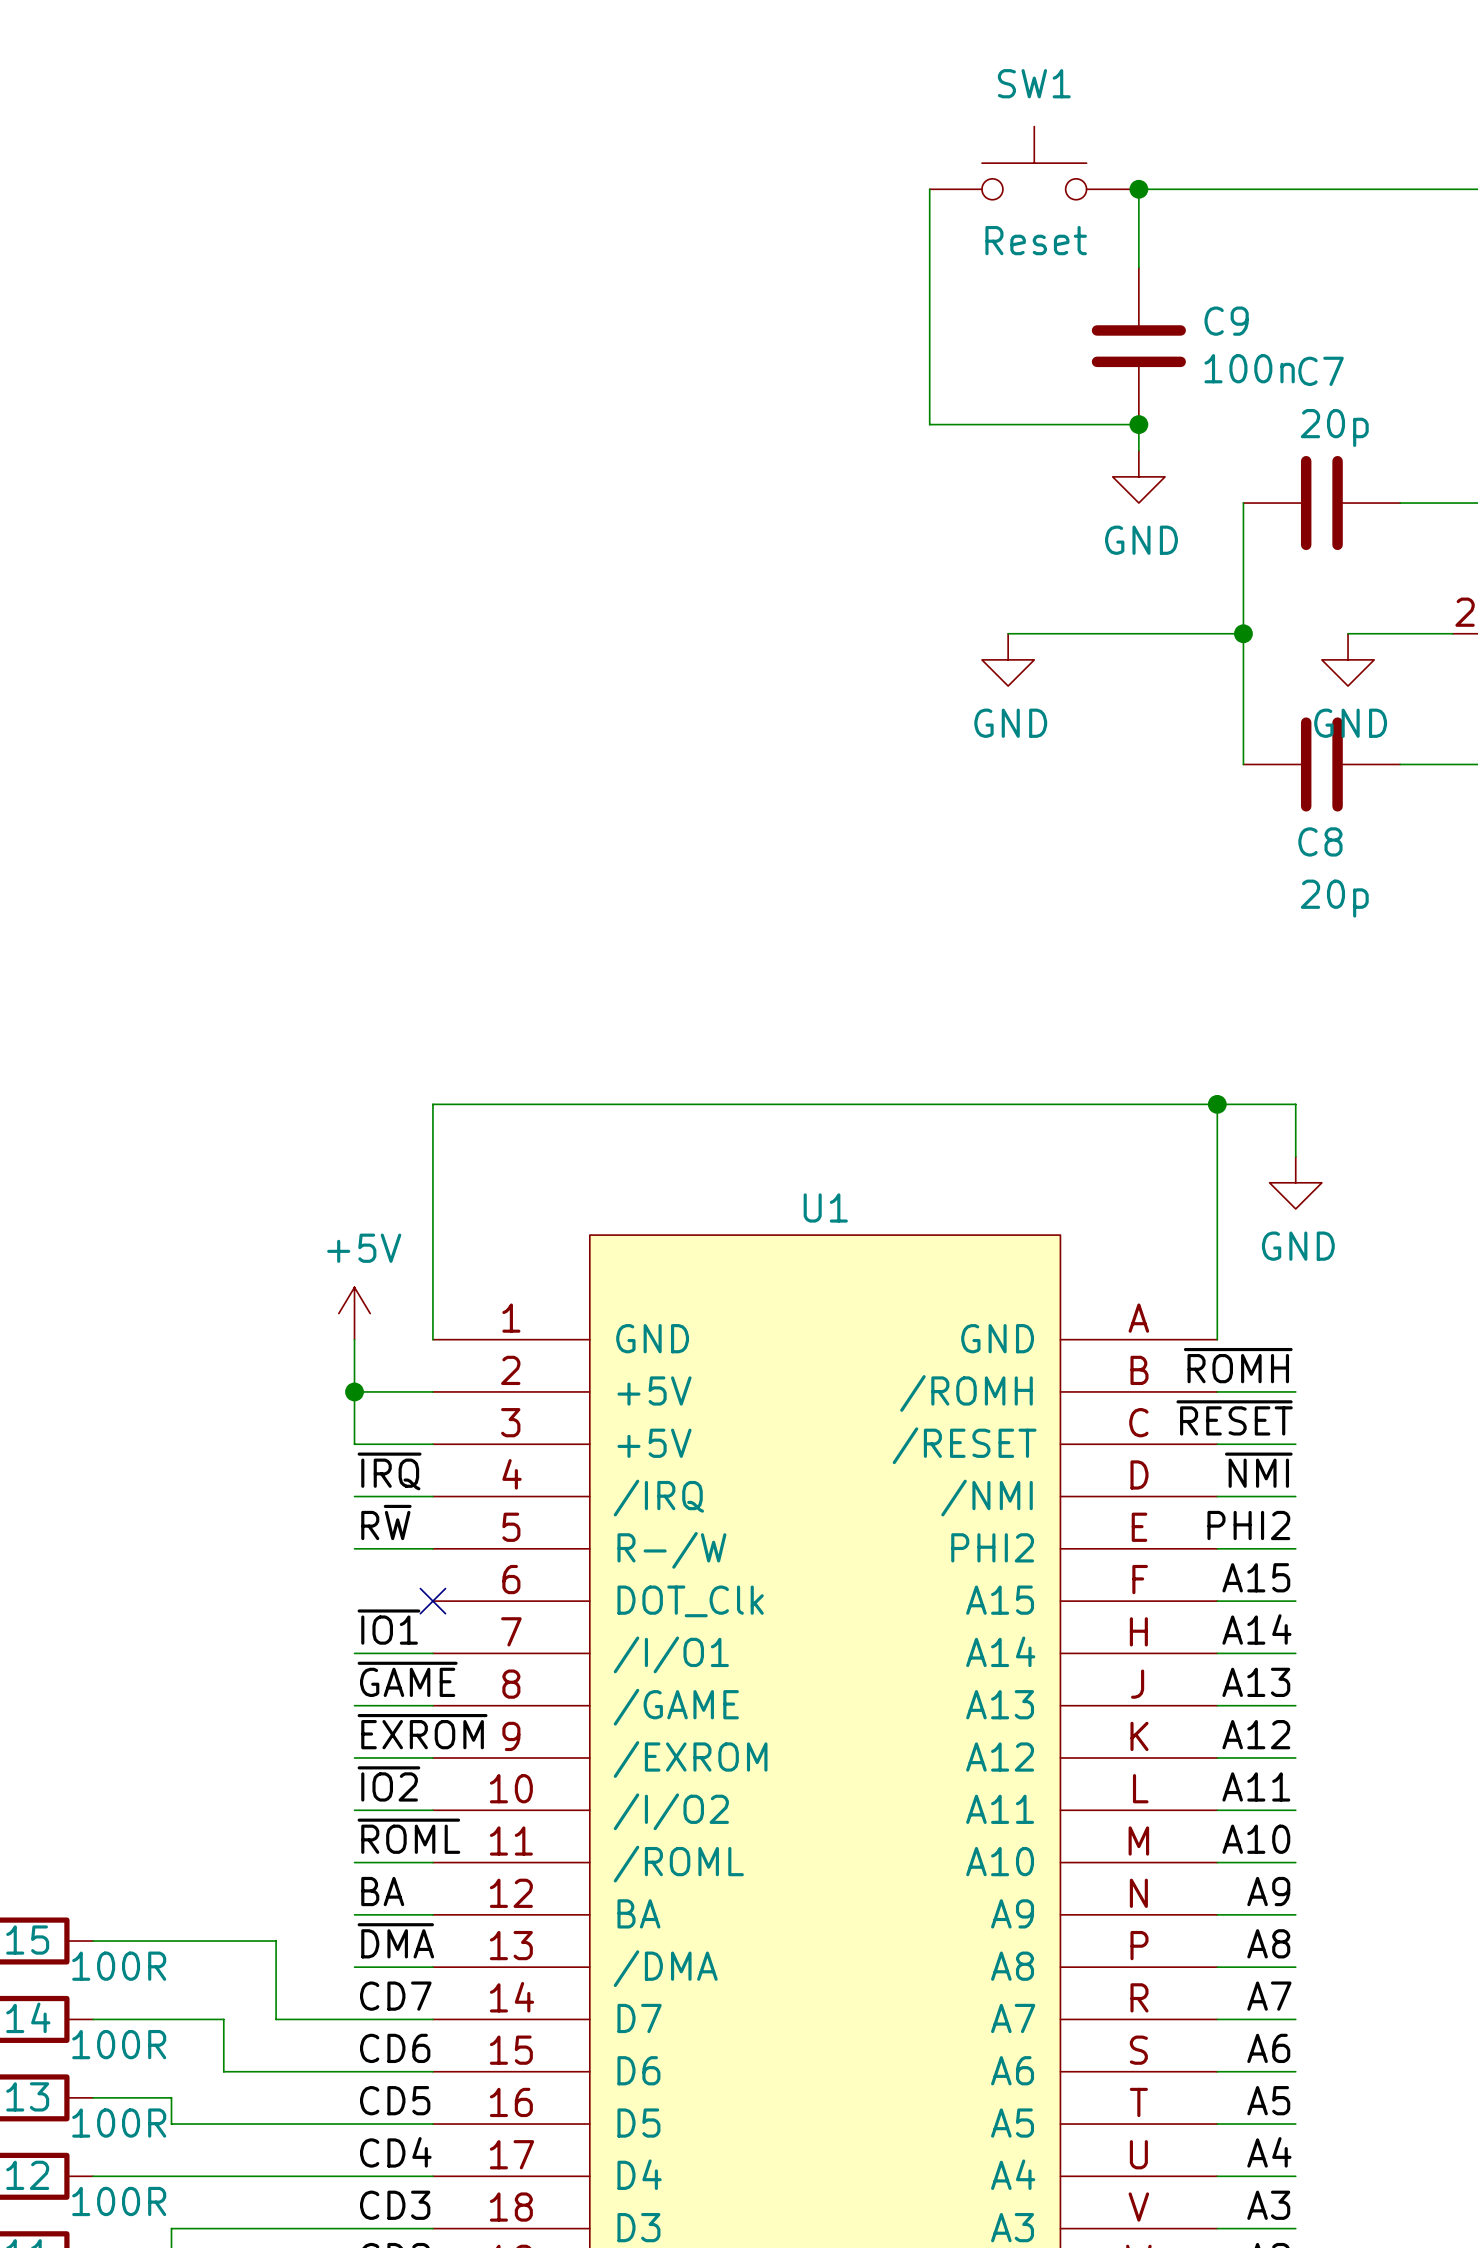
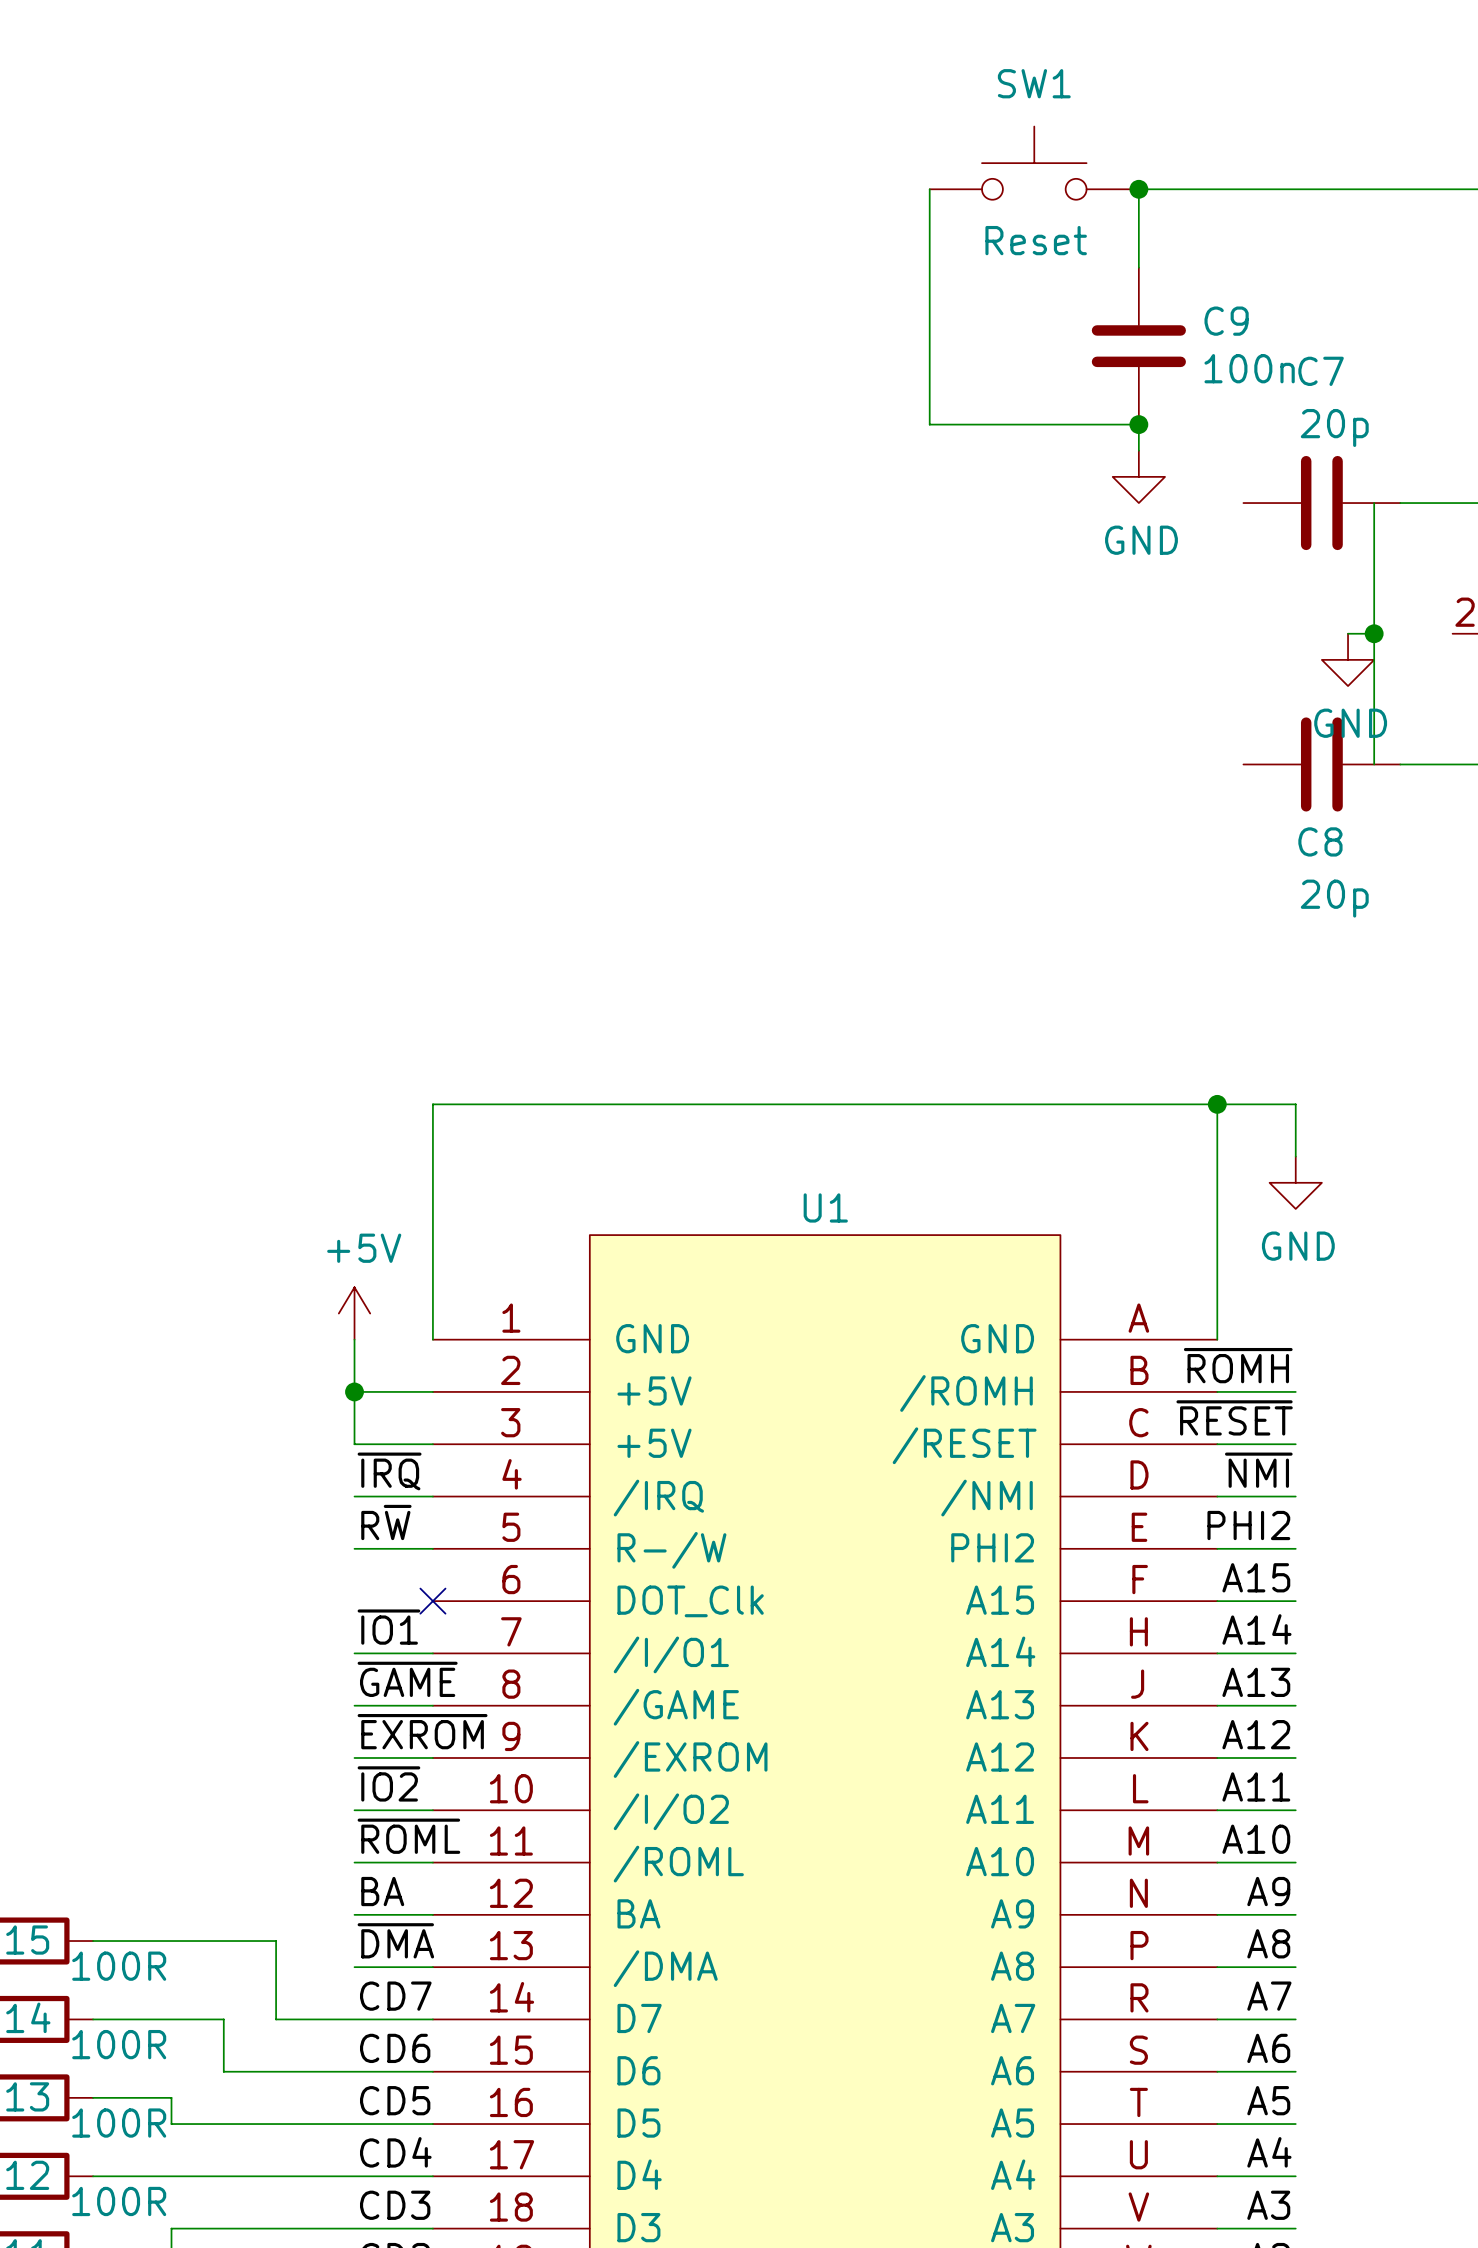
wire: (1243, 503) (1243, 764) -> (1374, 503) (1374, 764)
wire: (1008, 633) (1243, 633) -> none
junction: (1243, 633) -> none
wire: (1374, 633) (1452, 633) -> none
junction: none -> (1374, 633)
power symbol: GND (1008, 659) -> none

